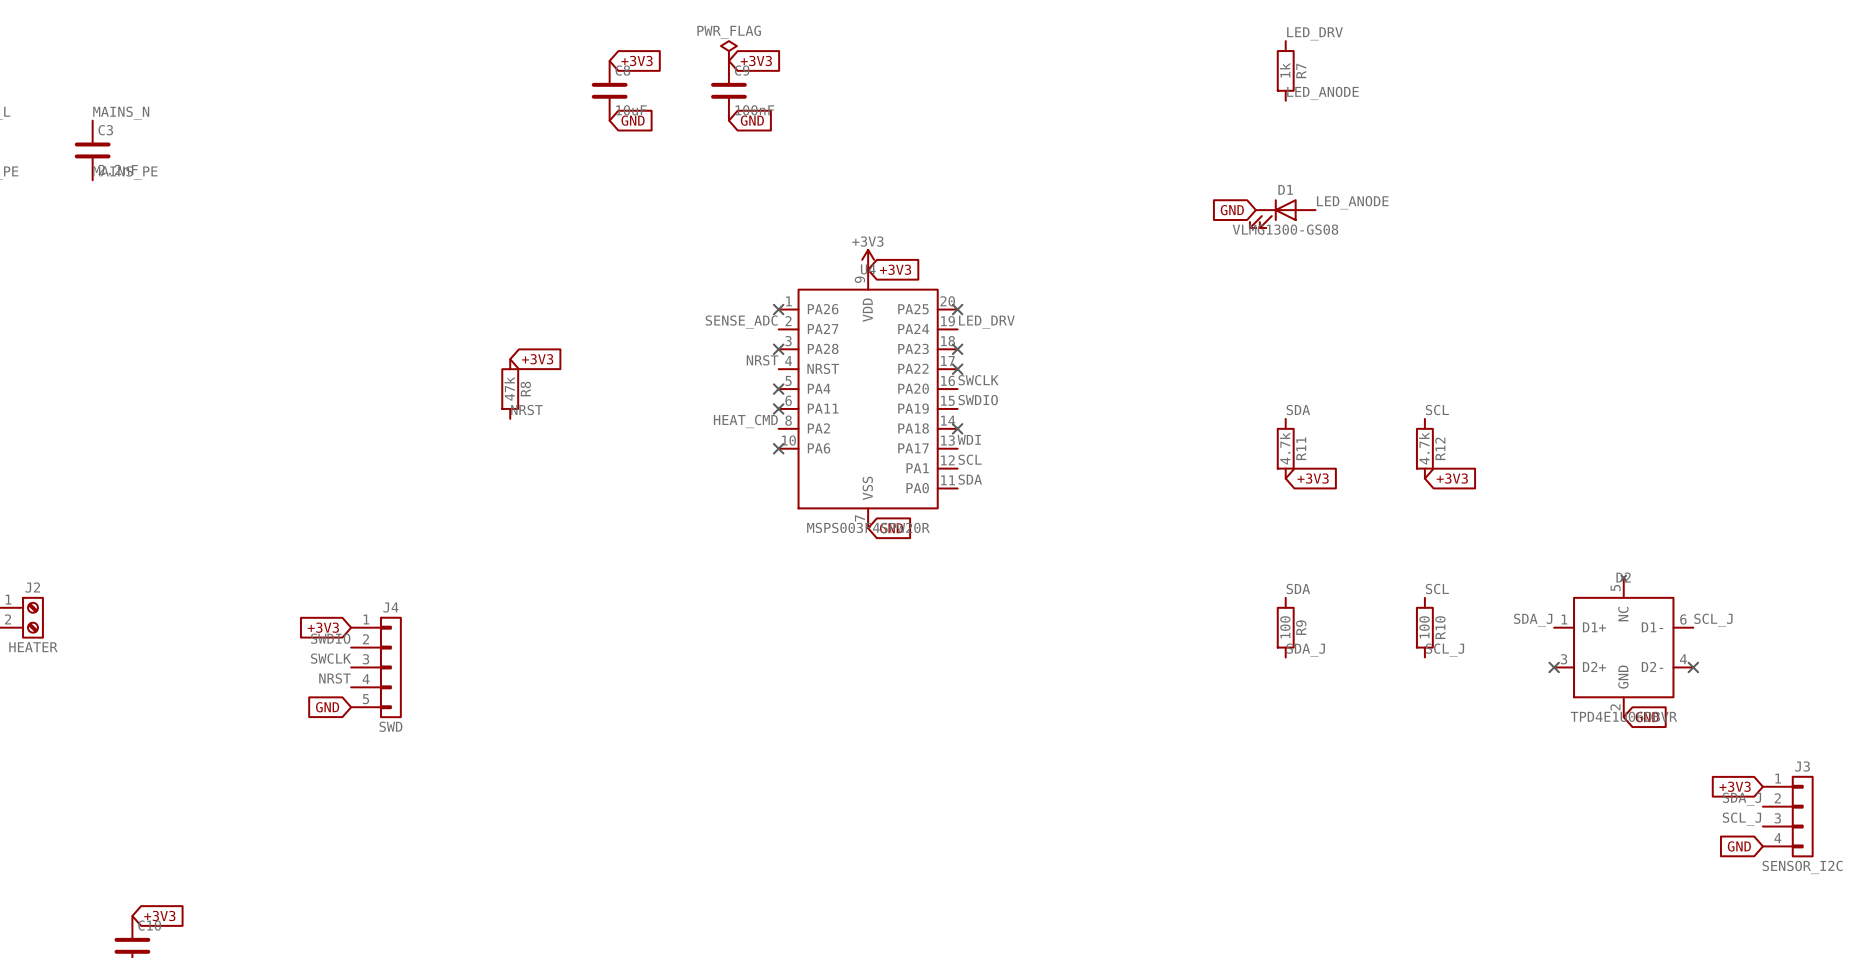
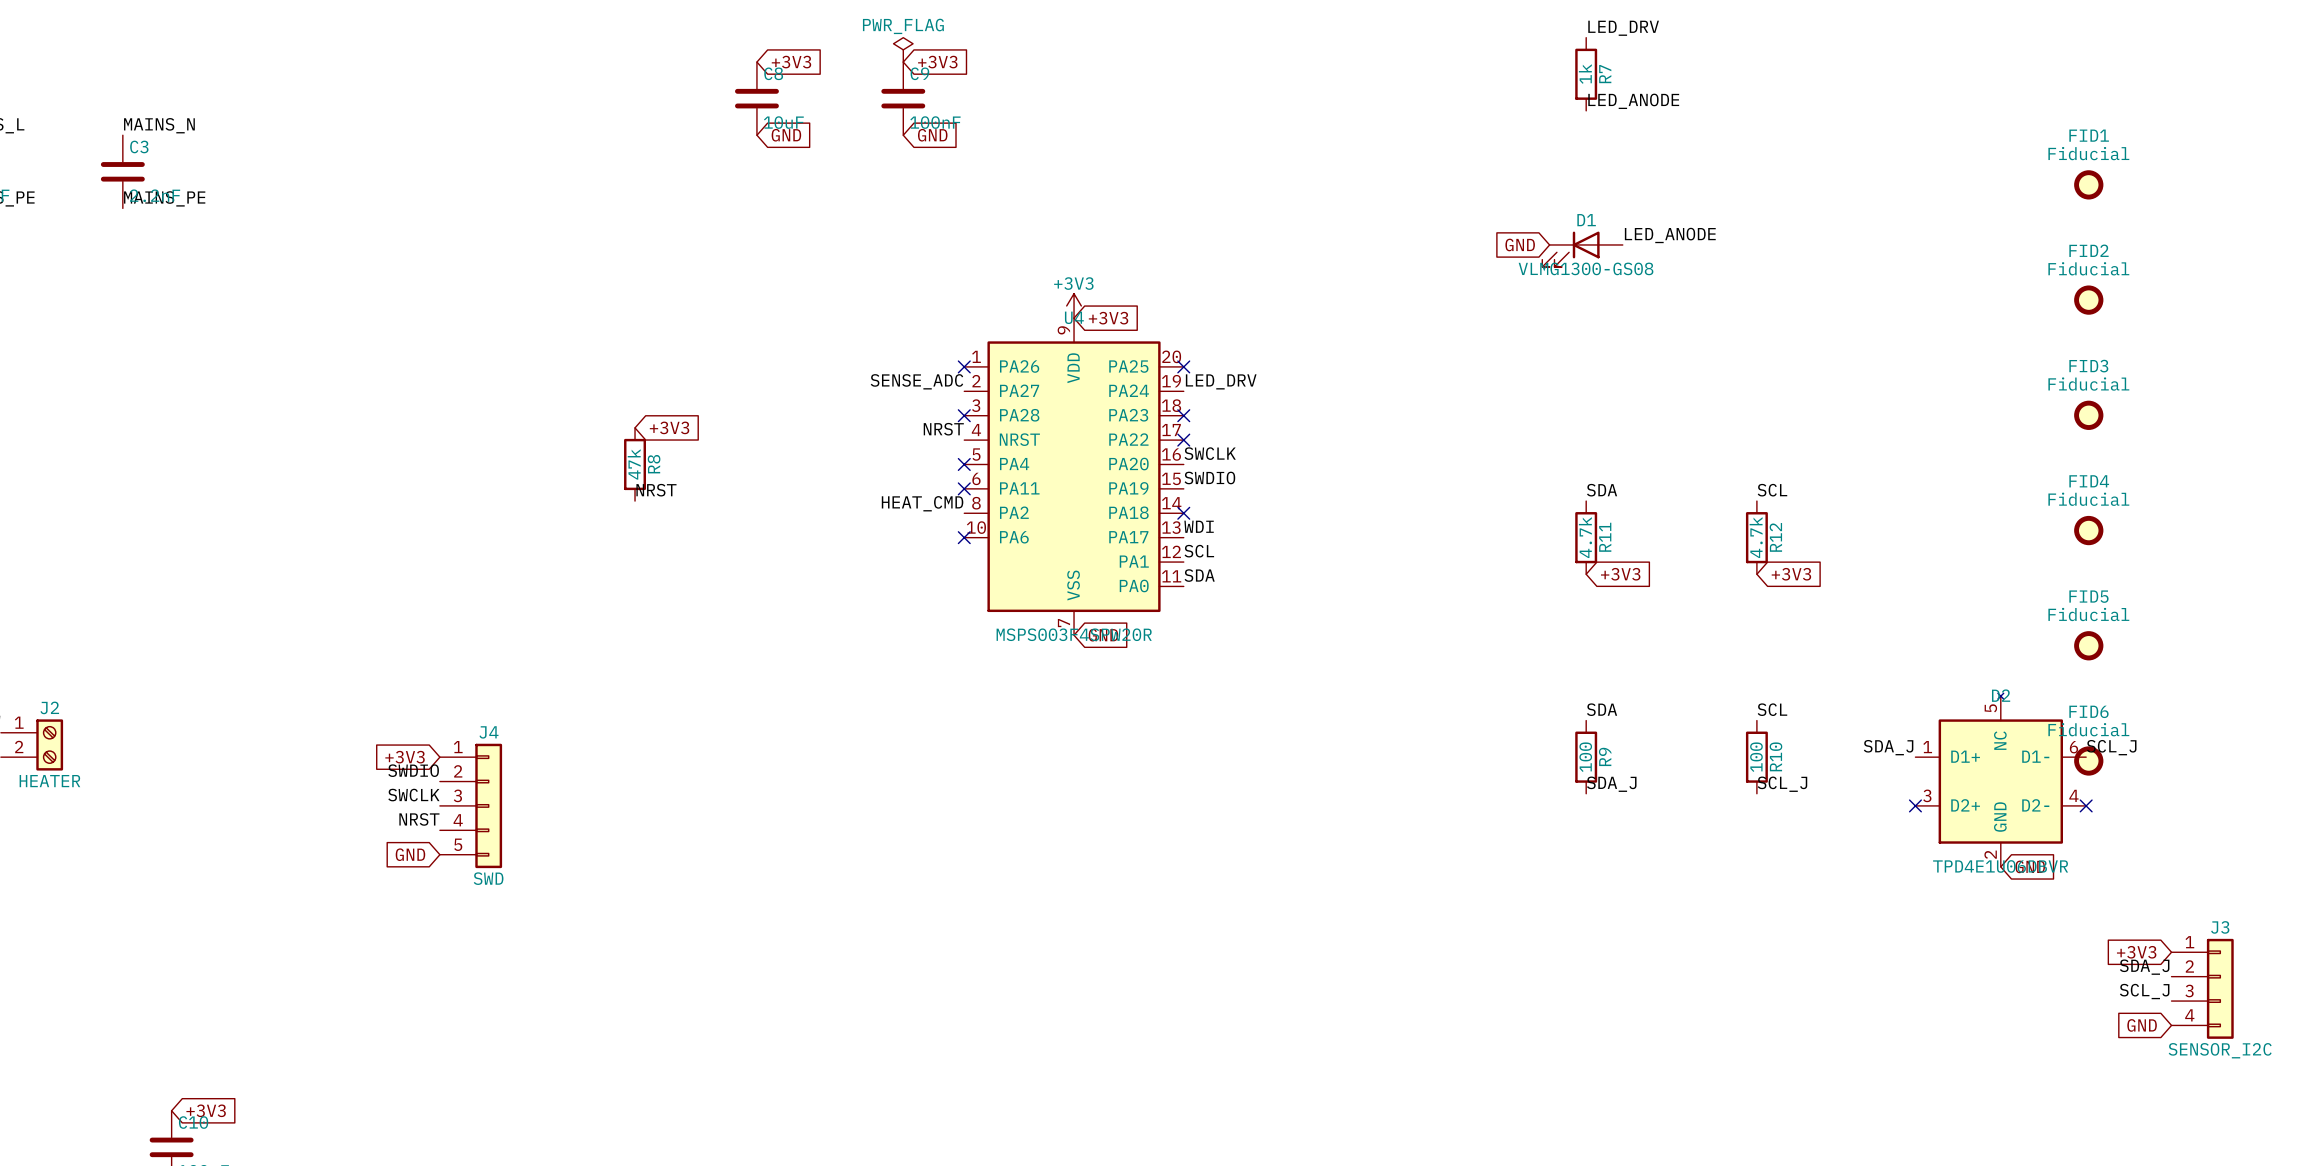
FID1: none -> Fiducial (2088, 184)
FID2: none -> Fiducial (2088, 300)
FID3: none -> Fiducial (2088, 415)
FID4: none -> Fiducial (2088, 530)
FID5: none -> Fiducial (2088, 645)
FID6: none -> Fiducial (2088, 760)

